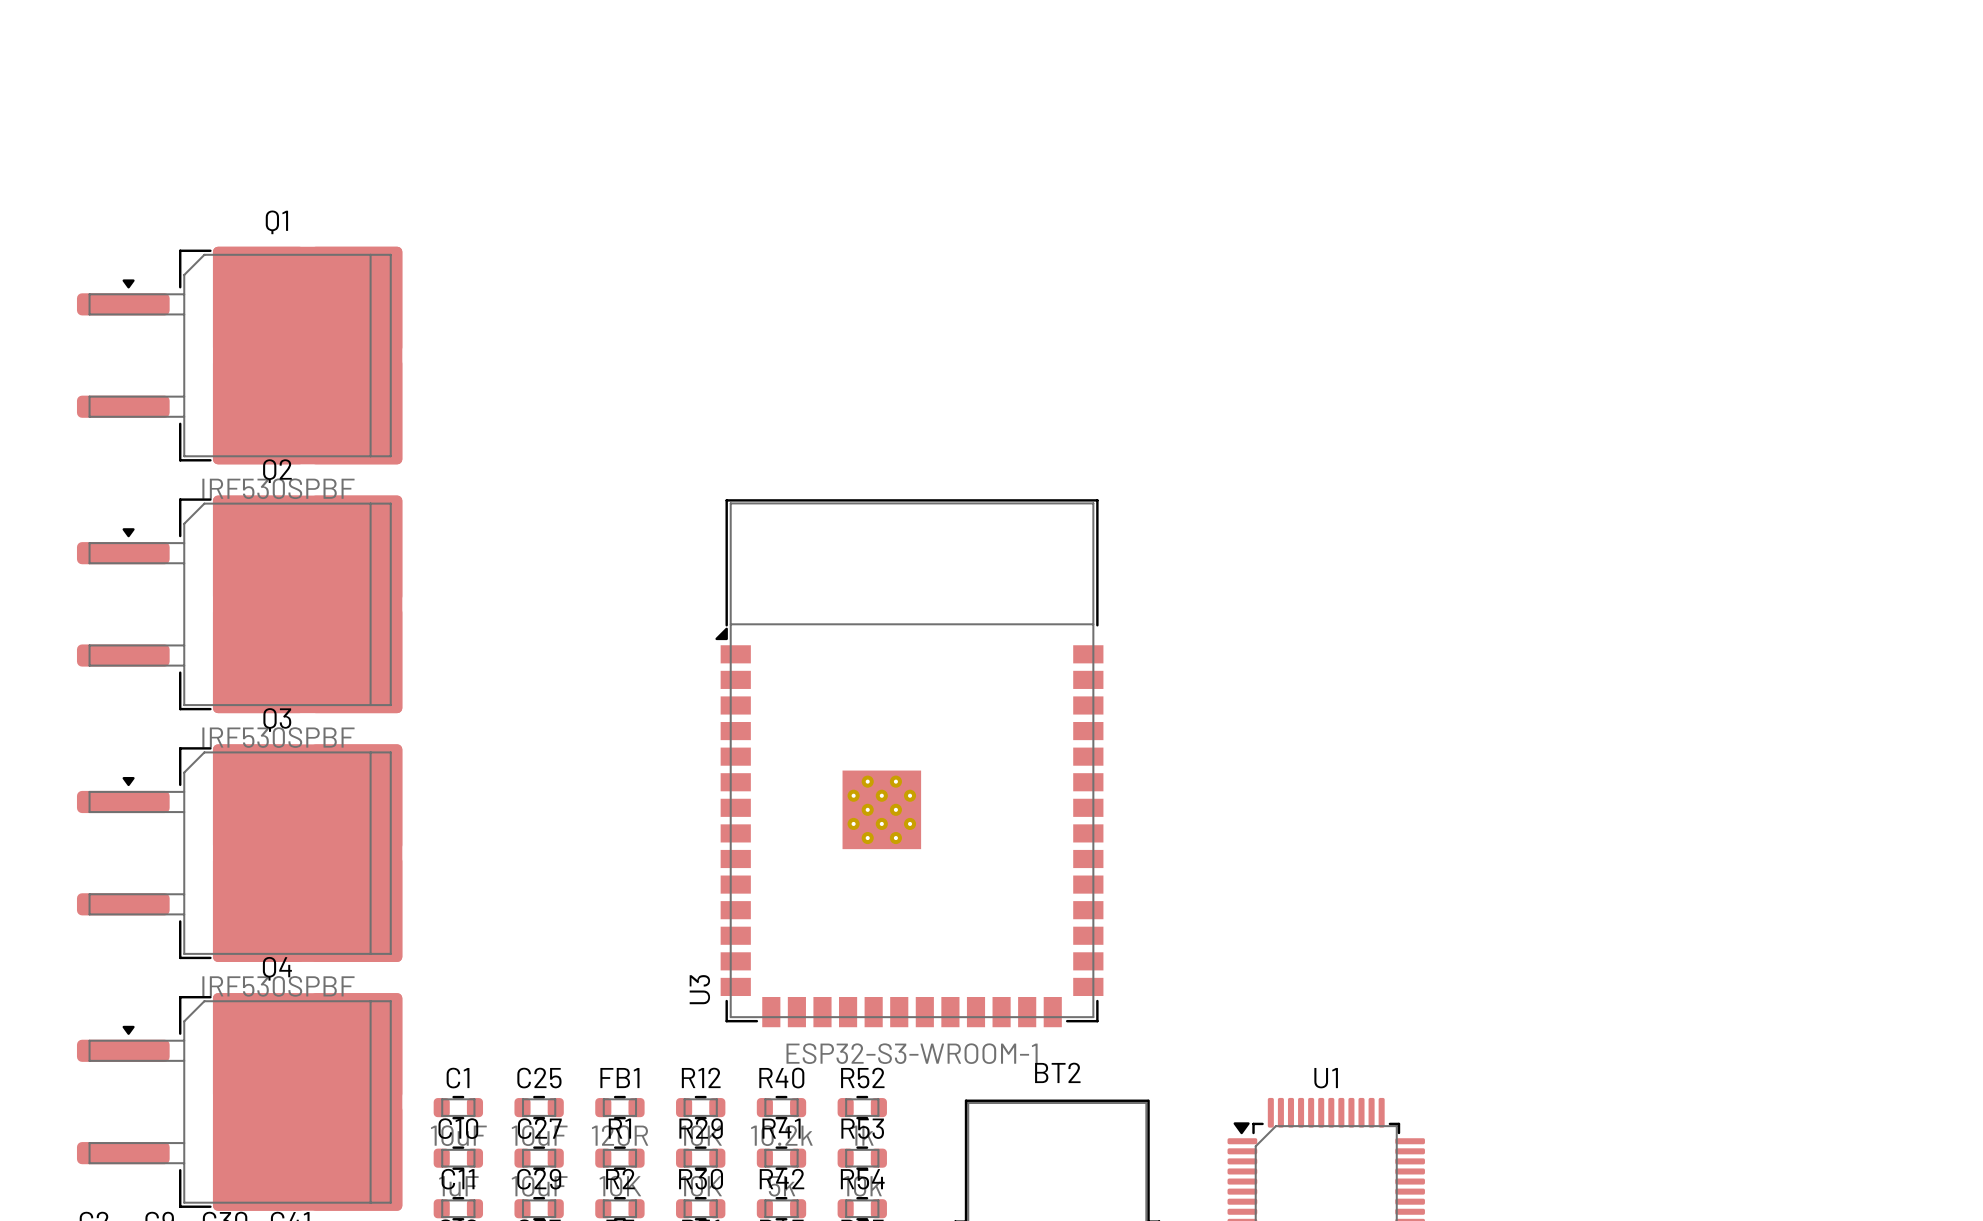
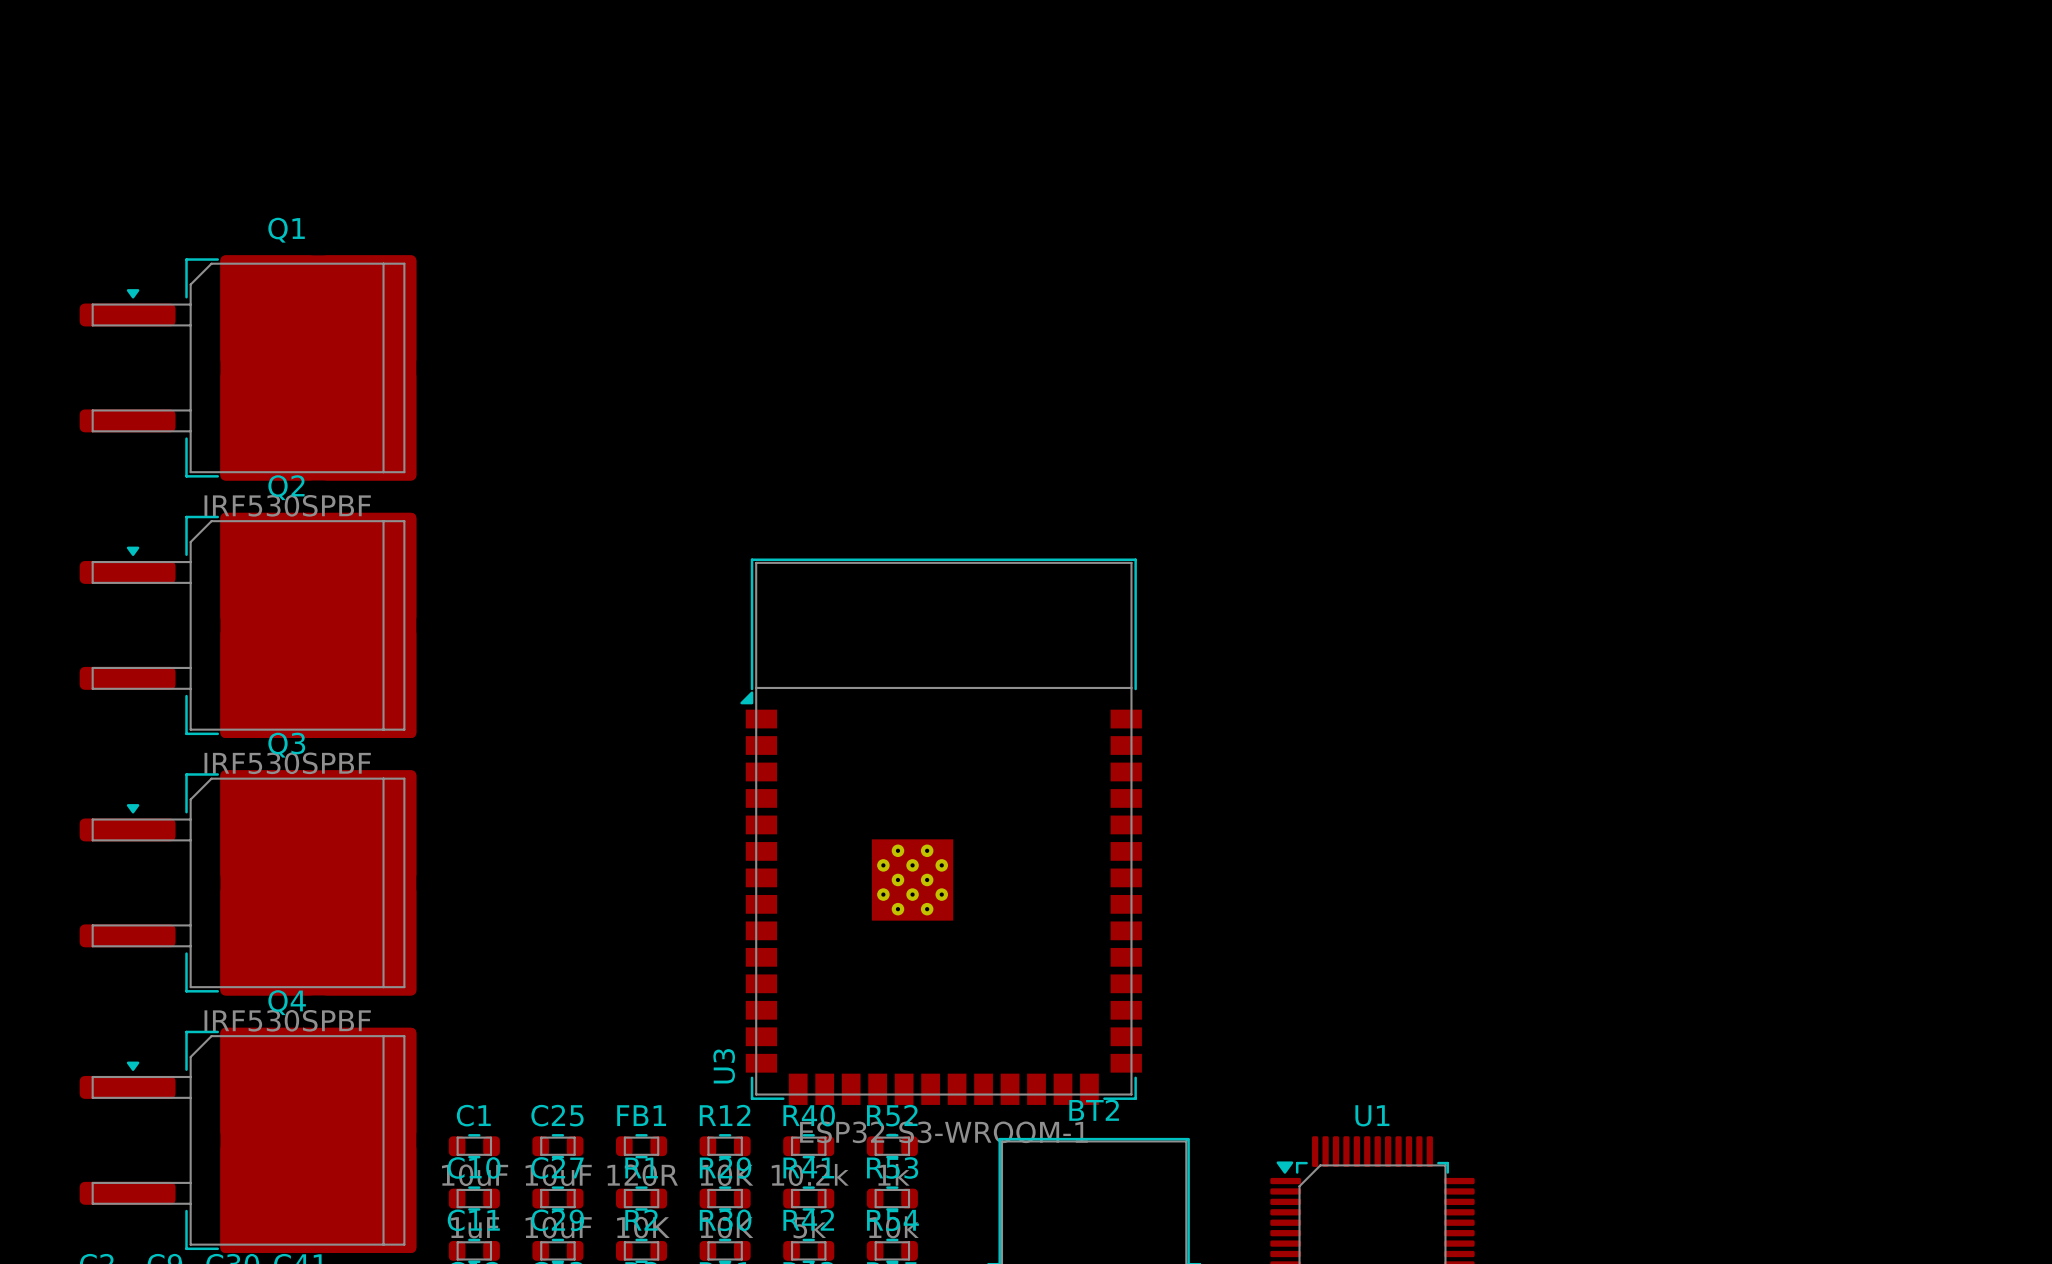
U3 position: (909, 763) -> (941, 831)

